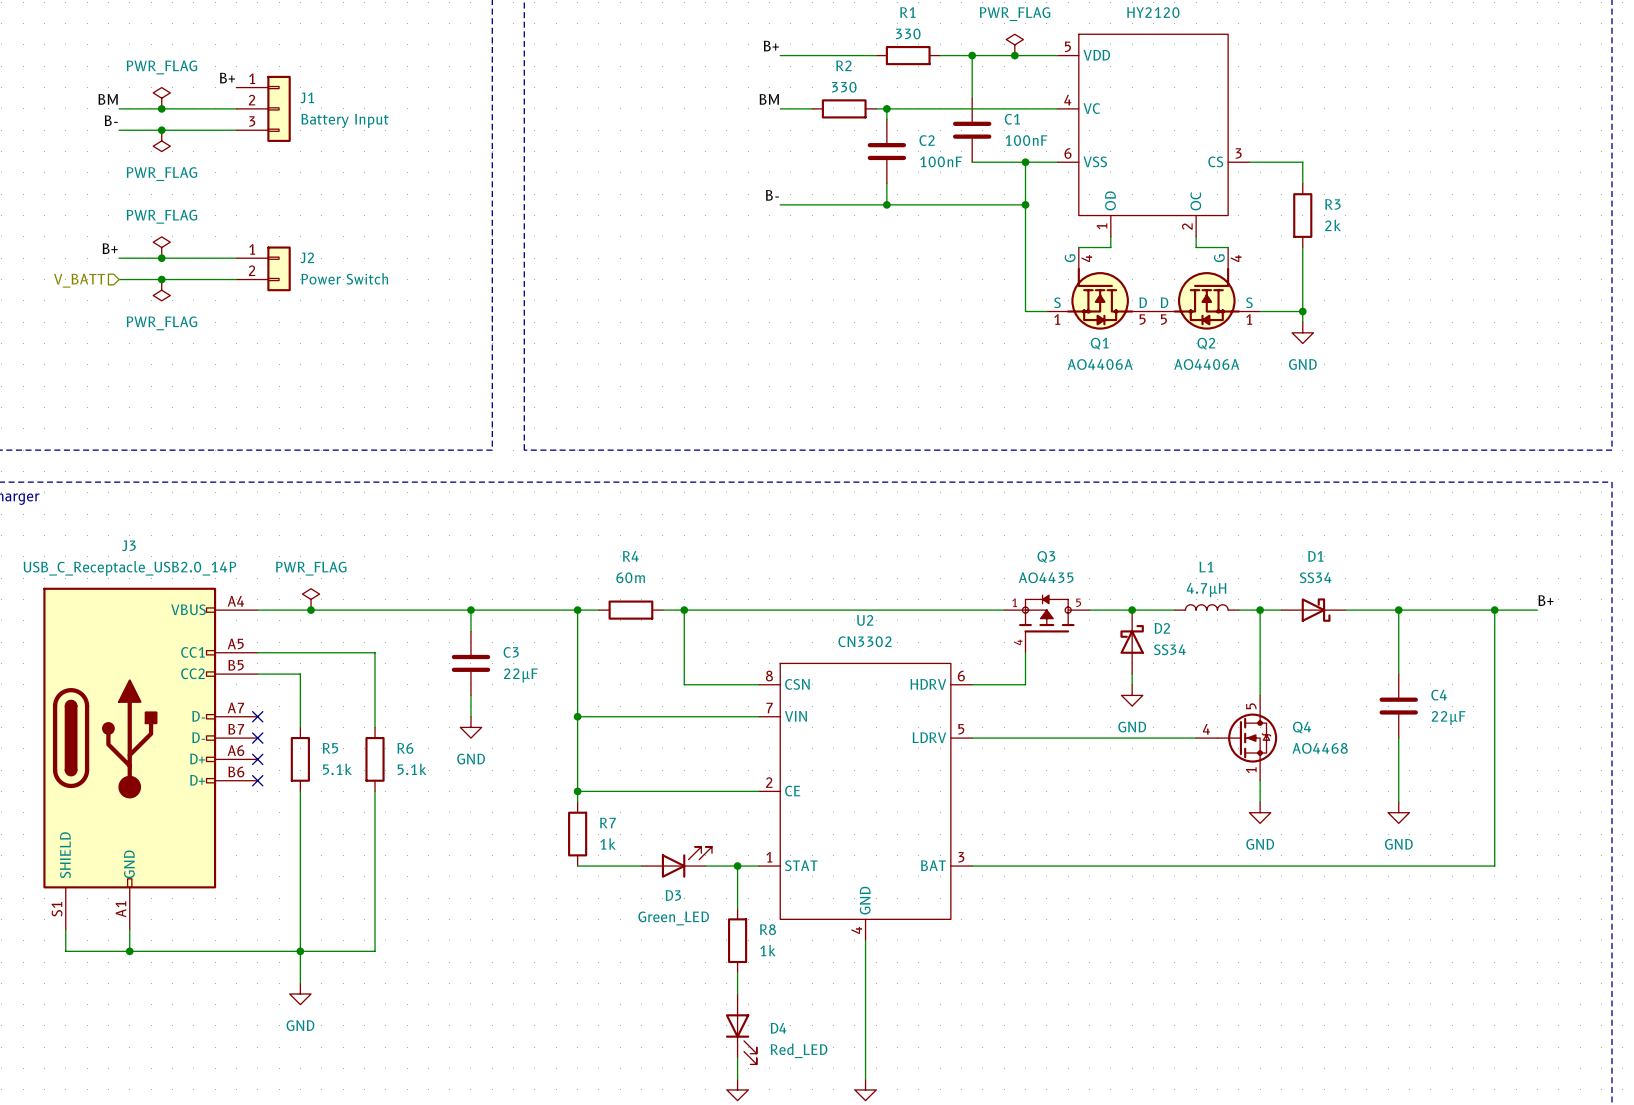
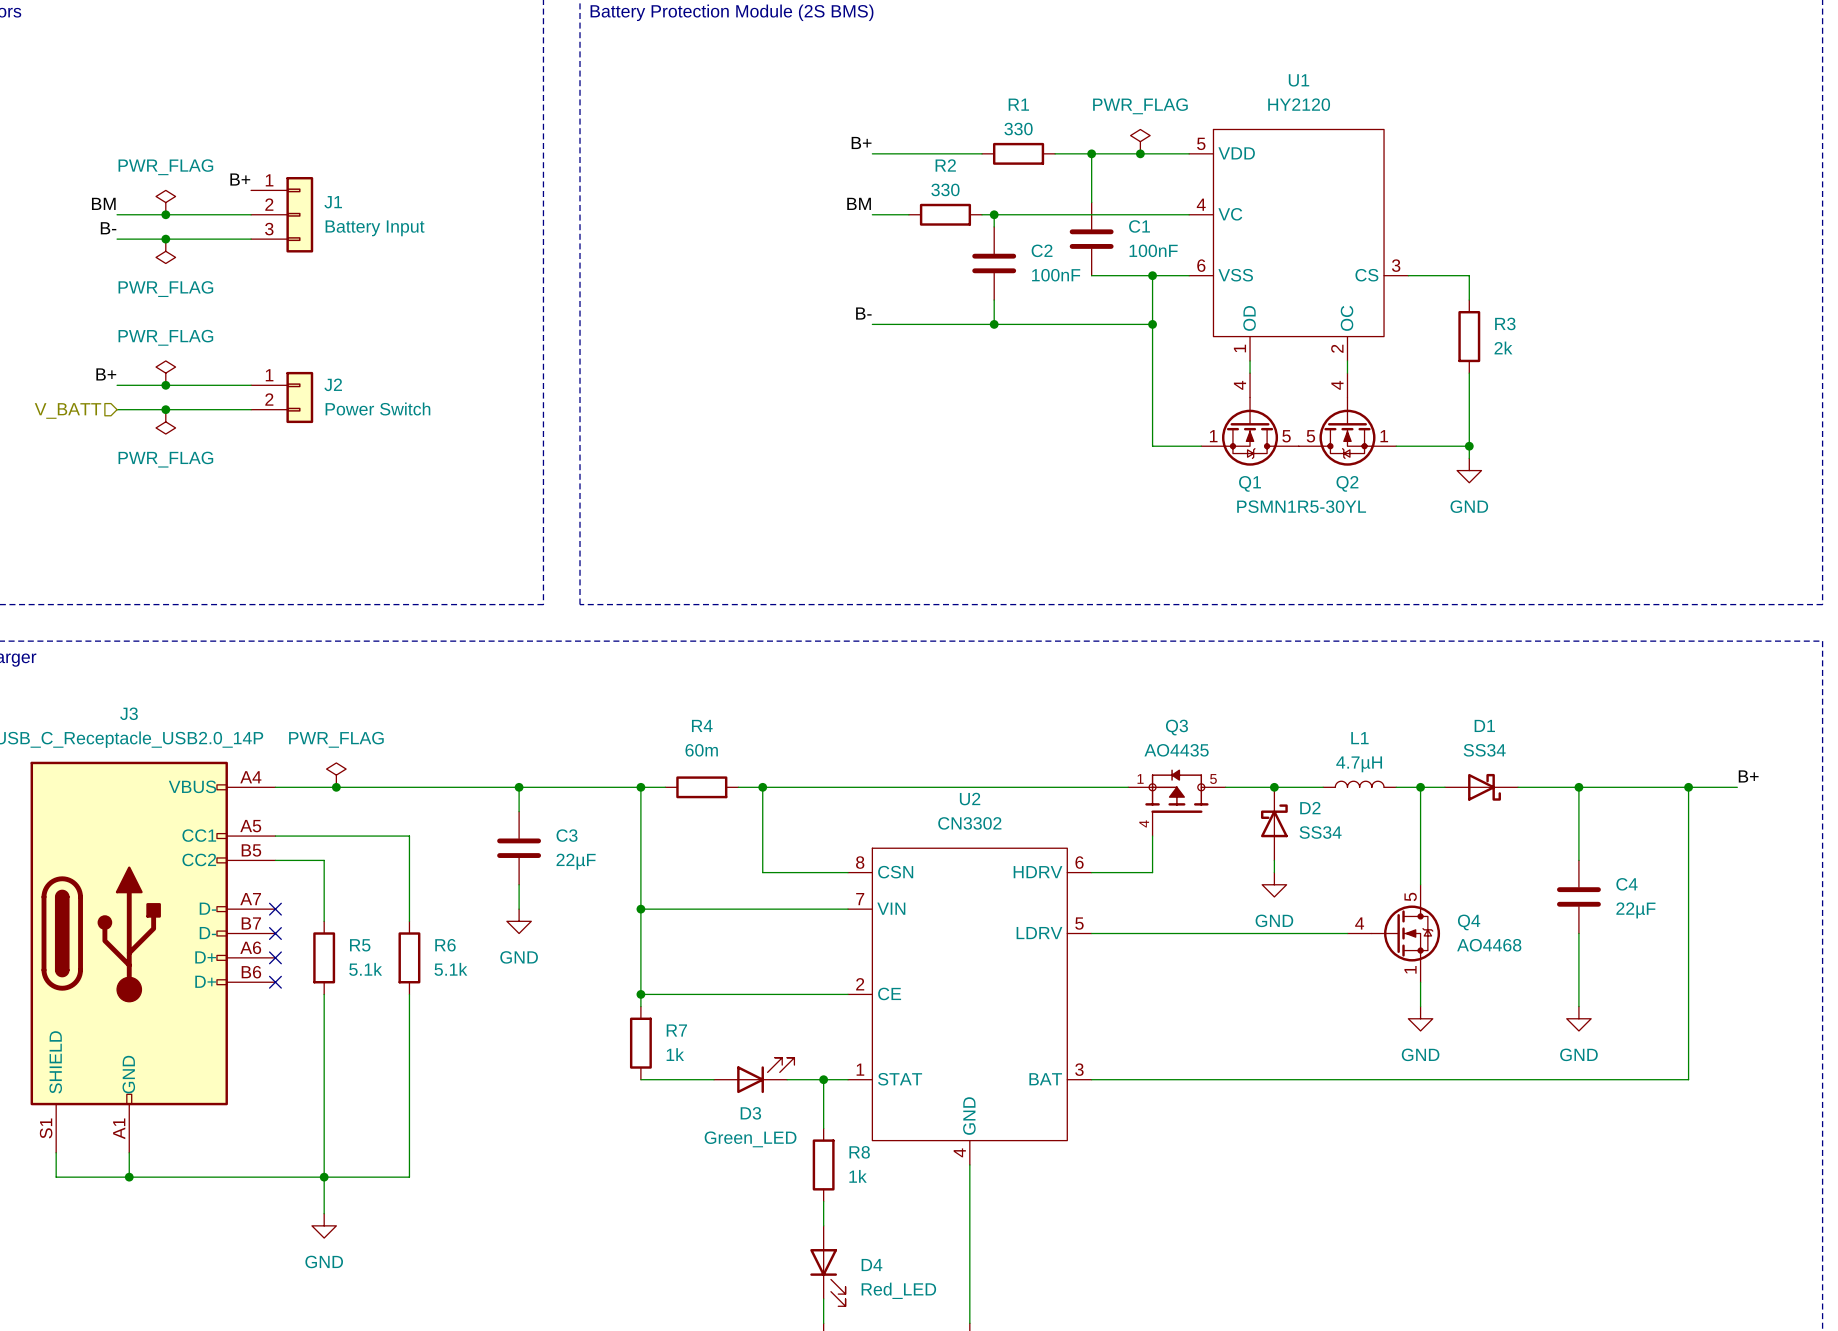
Q1 symbol: [1046, 247, 1154, 330] -> [1201, 373, 1299, 466]
wire: (1078, 247) (1110, 247) -> none
Q2 symbol: [1153, 247, 1261, 330] -> [1298, 373, 1397, 466]
wire: (1196, 247) (1228, 247) -> none
Q1 text: AO4406A (1100, 364) -> none
Q1 value: none -> PSMN1R5-30YL (1301, 506)
Q2 text: AO4406A (1206, 364) -> none

